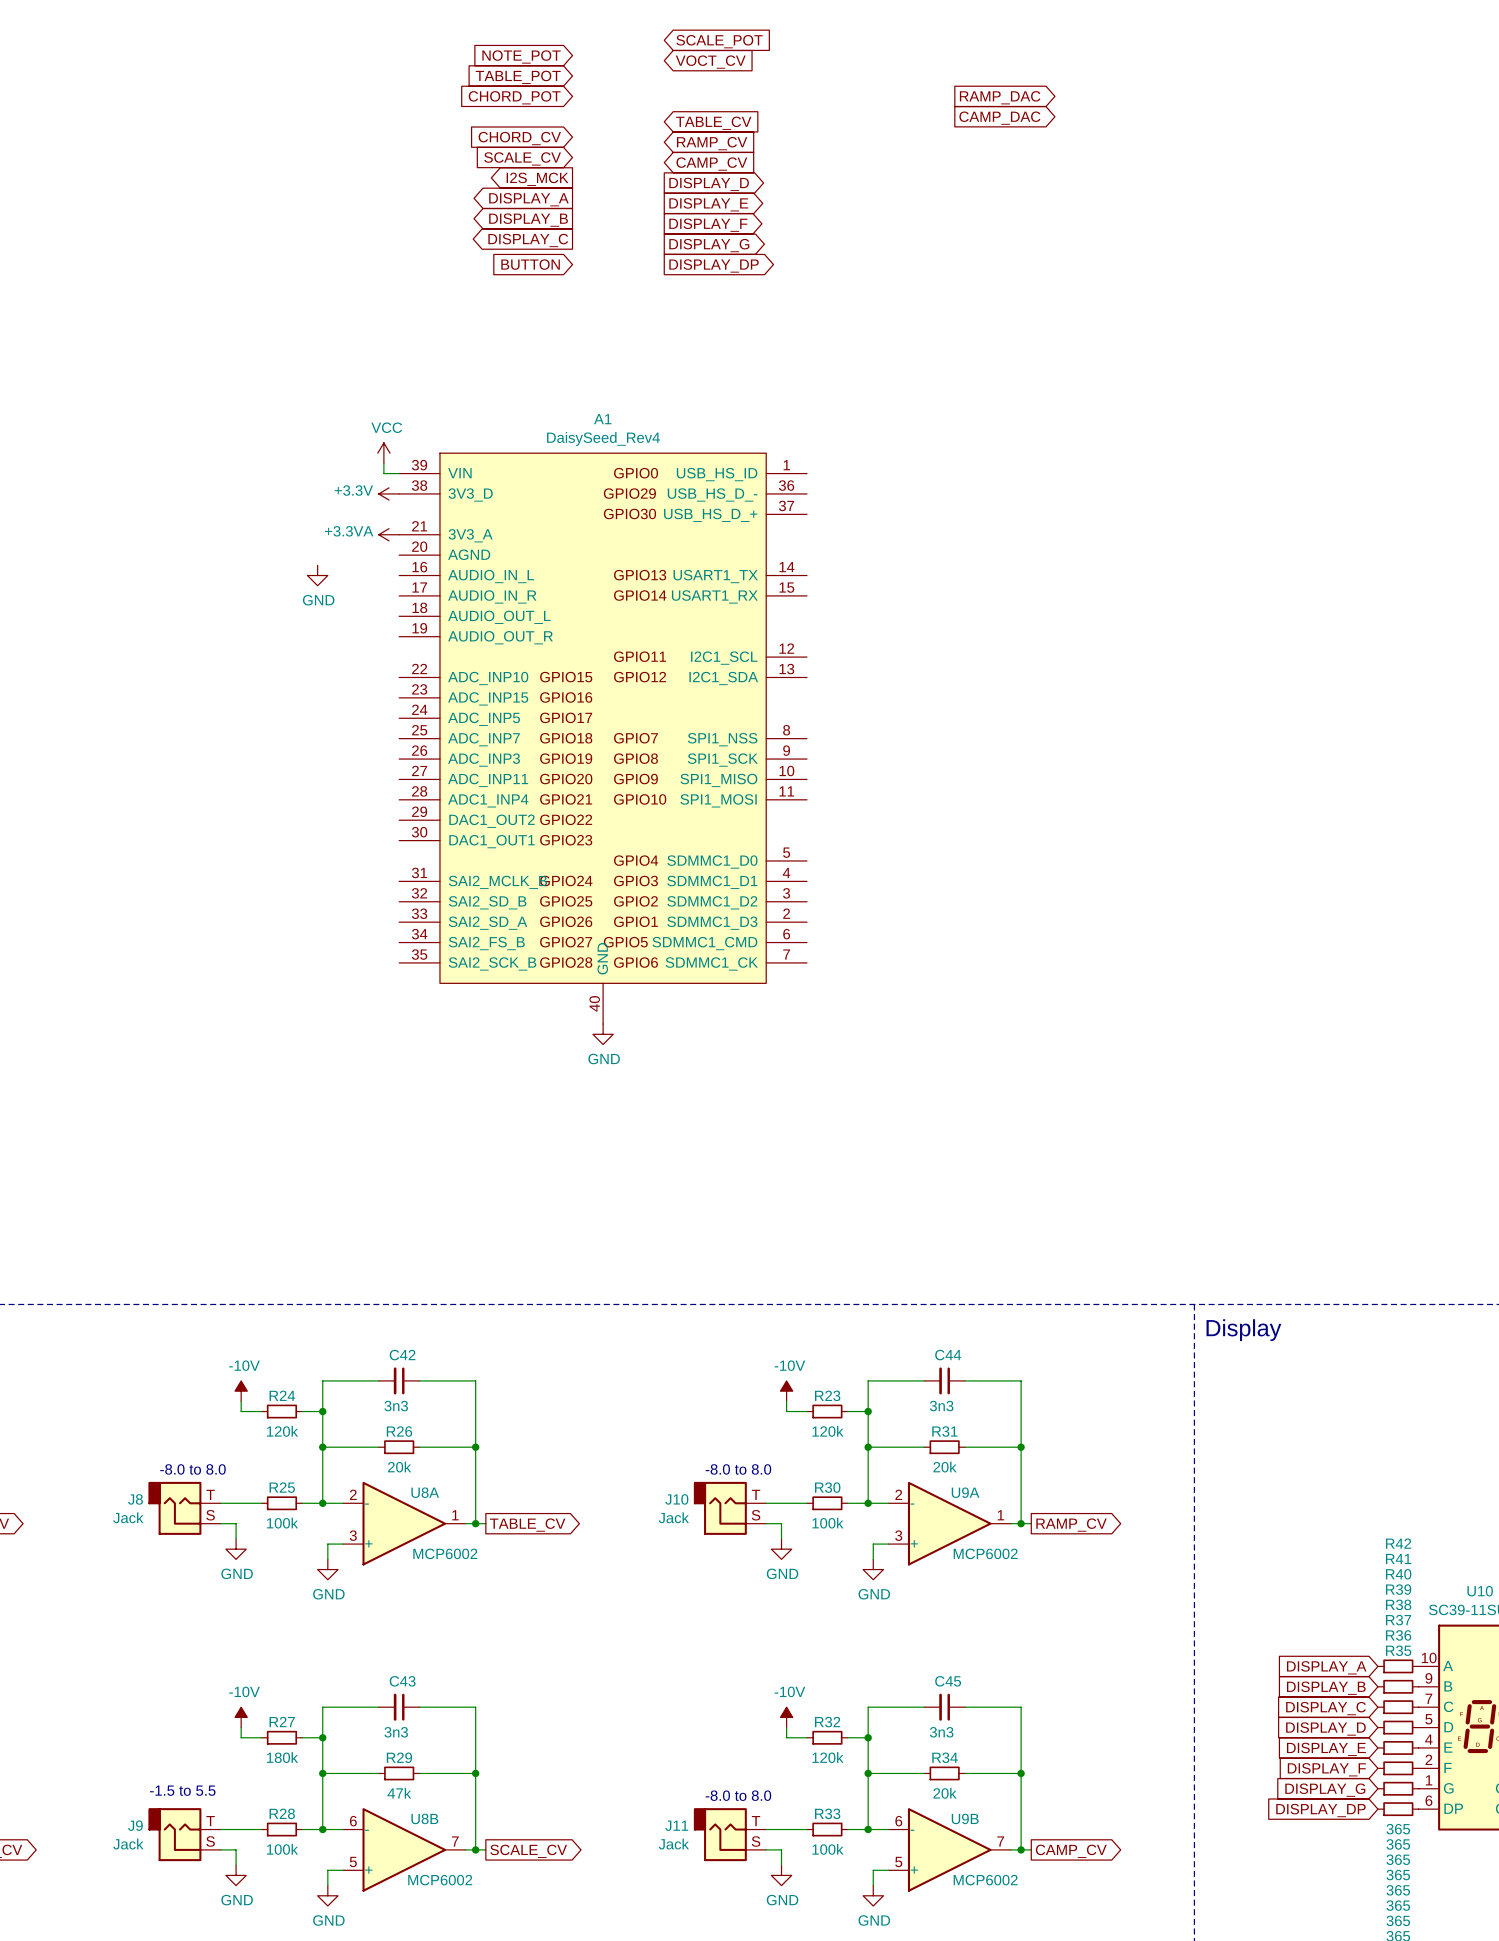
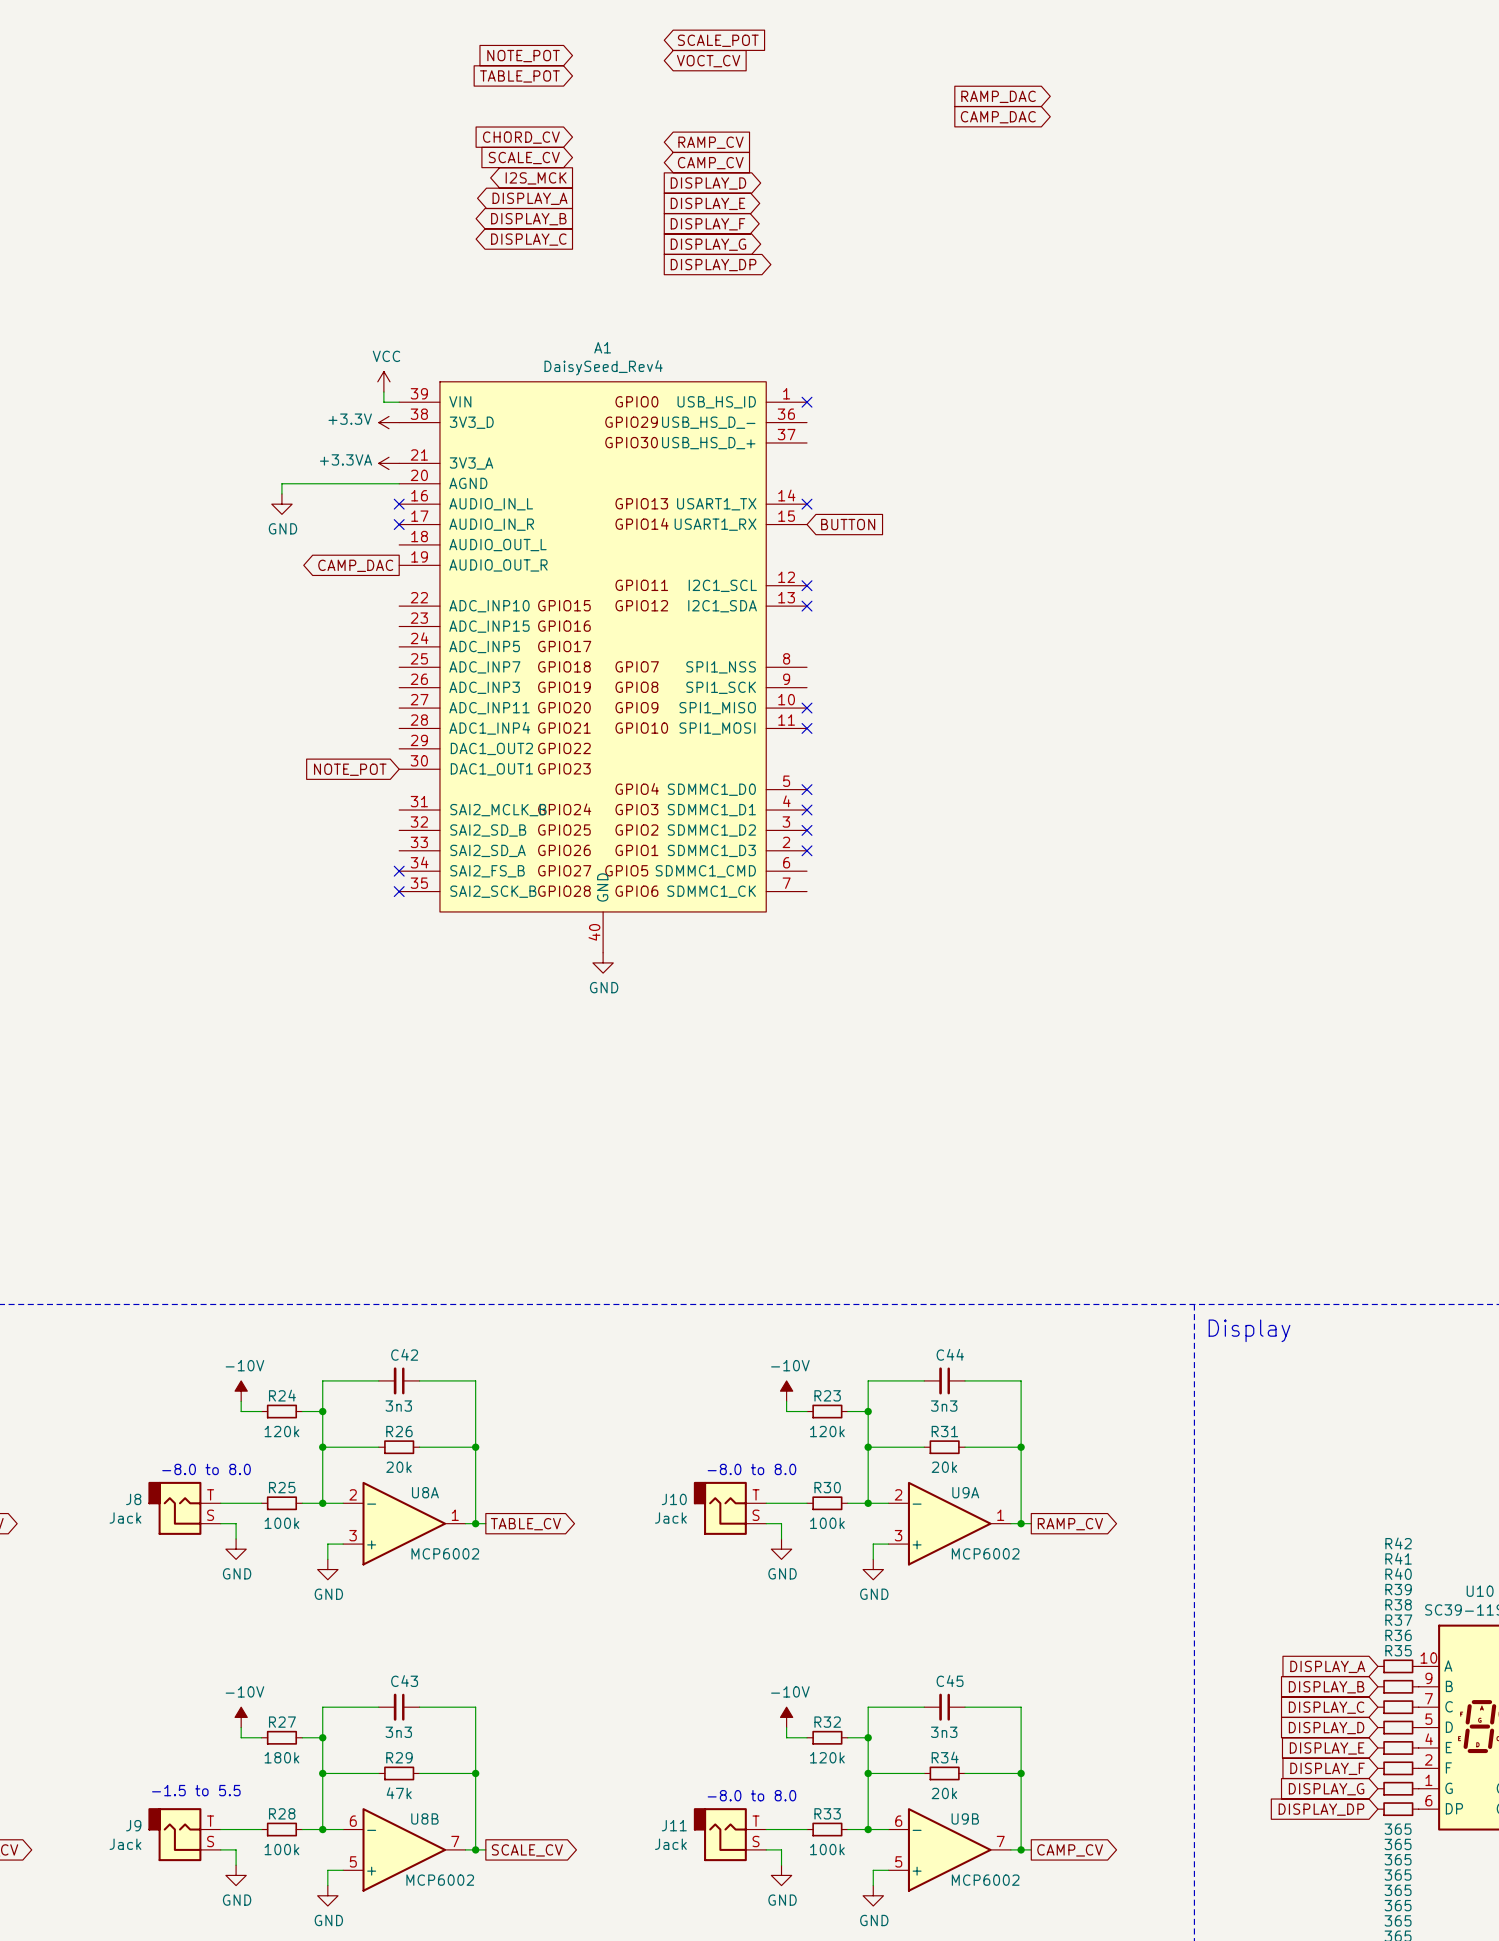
global label: CHORD_POT (514, 97) -> none
global label: TABLE_CV (713, 123) -> none
global label: BUTTON (530, 264) -> none
no-connect mark: none -> (807, 402)
power symbol position: VCC (383, 453) -> VCC (383, 381)
wire: (383, 463) (383, 473) (399, 473) -> (383, 392) (383, 402) (399, 402)
wire: none -> (399, 483) (281, 483) (281, 493)
power symbol position: +3.3V (389, 493) -> +3.3V (389, 422)
no-connect mark: none -> (399, 504)
no-connect mark: none -> (807, 504)
no-connect mark: none -> (399, 524)
global label: none -> BUTTON (848, 524)
power symbol position: +3.3VA (389, 534) -> +3.3VA (389, 463)
global label: none -> CAMP_DAC (355, 565)
power symbol position: GND (317, 575) -> GND (281, 504)
no-connect mark: none -> (807, 585)
no-connect mark: none -> (807, 606)
no-connect mark: none -> (807, 708)
no-connect mark: none -> (807, 728)
A1 position: (603, 738) -> (603, 667)
global label: none -> NOTE_POT (350, 769)
no-connect mark: none -> (807, 789)
no-connect mark: none -> (807, 810)
no-connect mark: none -> (807, 830)
no-connect mark: none -> (807, 850)
no-connect mark: none -> (399, 871)
no-connect mark: none -> (399, 891)
power symbol position: GND (603, 1034) -> GND (603, 962)

